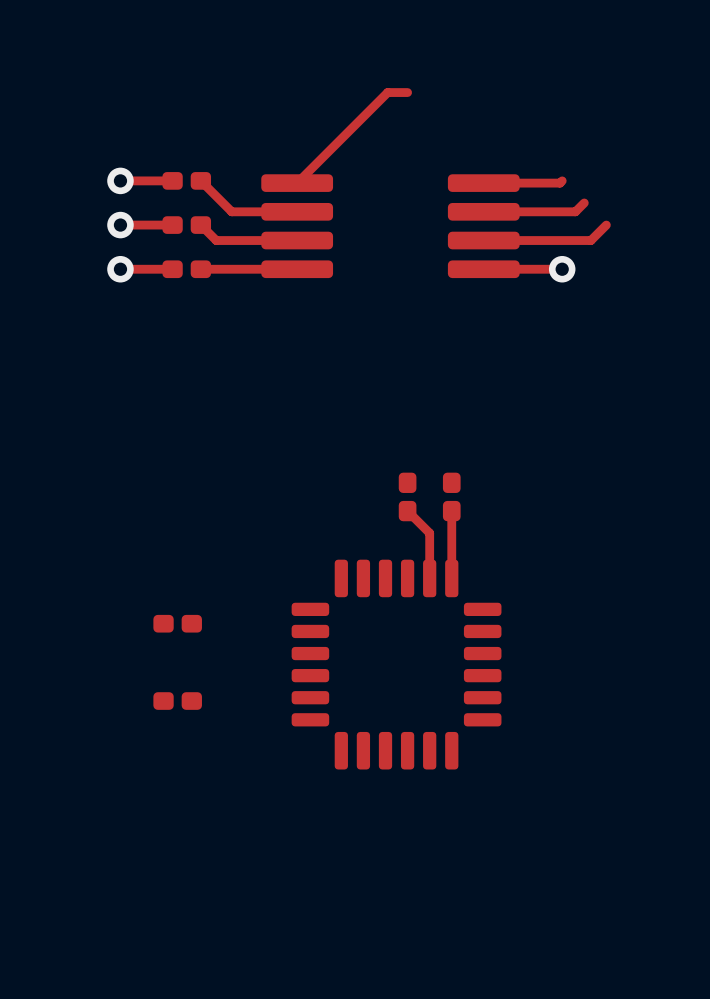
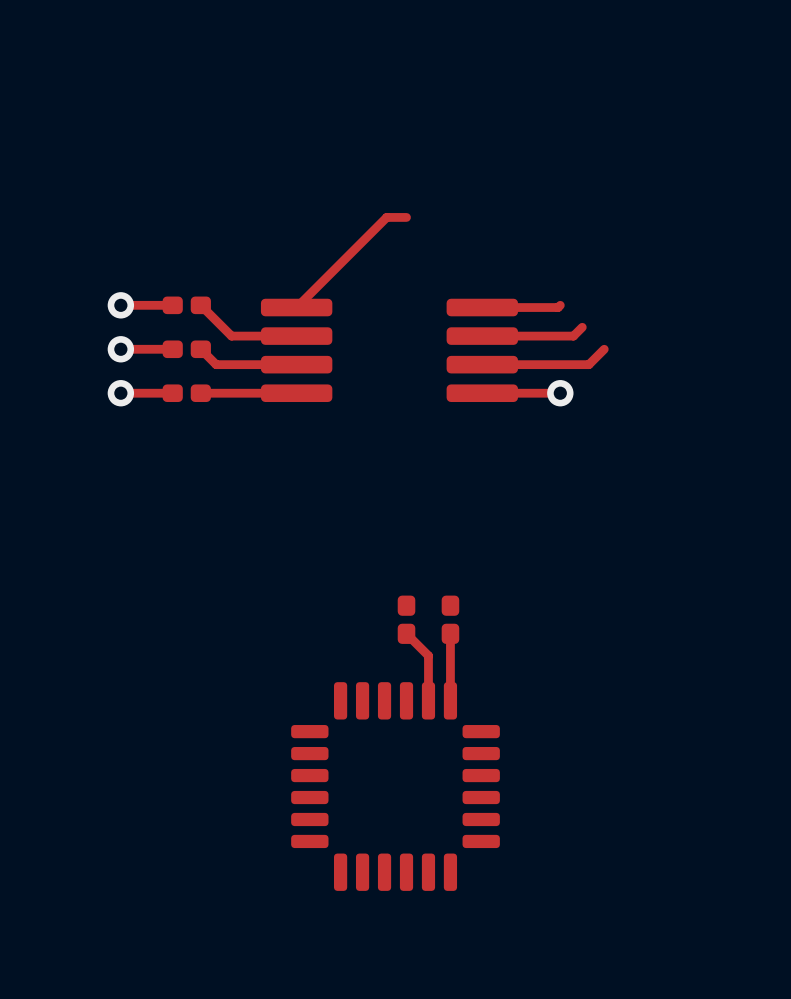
part: (177, 623) -> none
part: (177, 701) -> none

